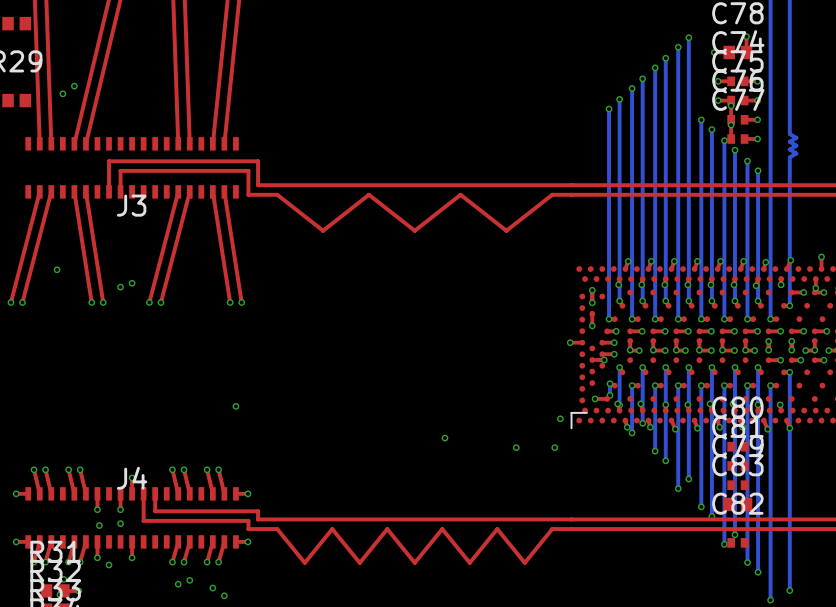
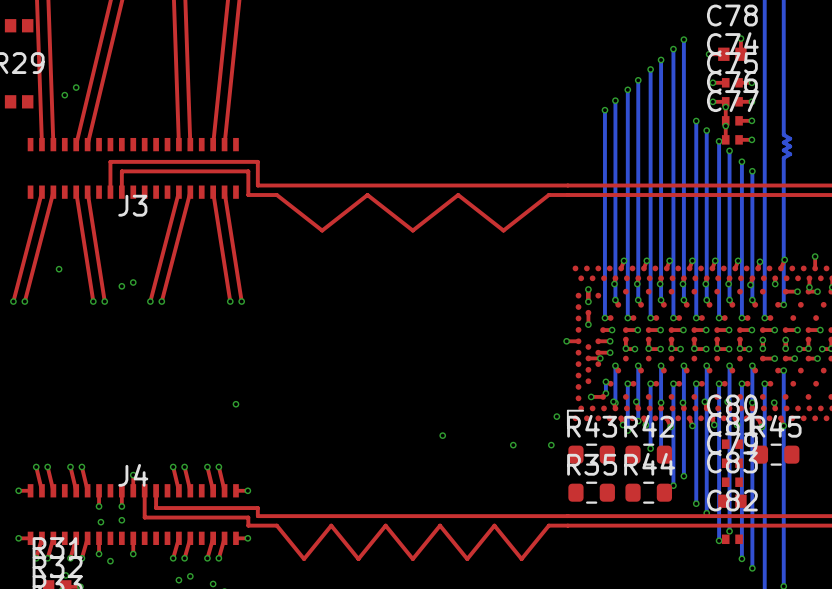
R43: none -> (591, 454)
R42: none -> (648, 454)
R45: none -> (776, 454)
R35: none -> (591, 492)
R44: none -> (648, 492)

